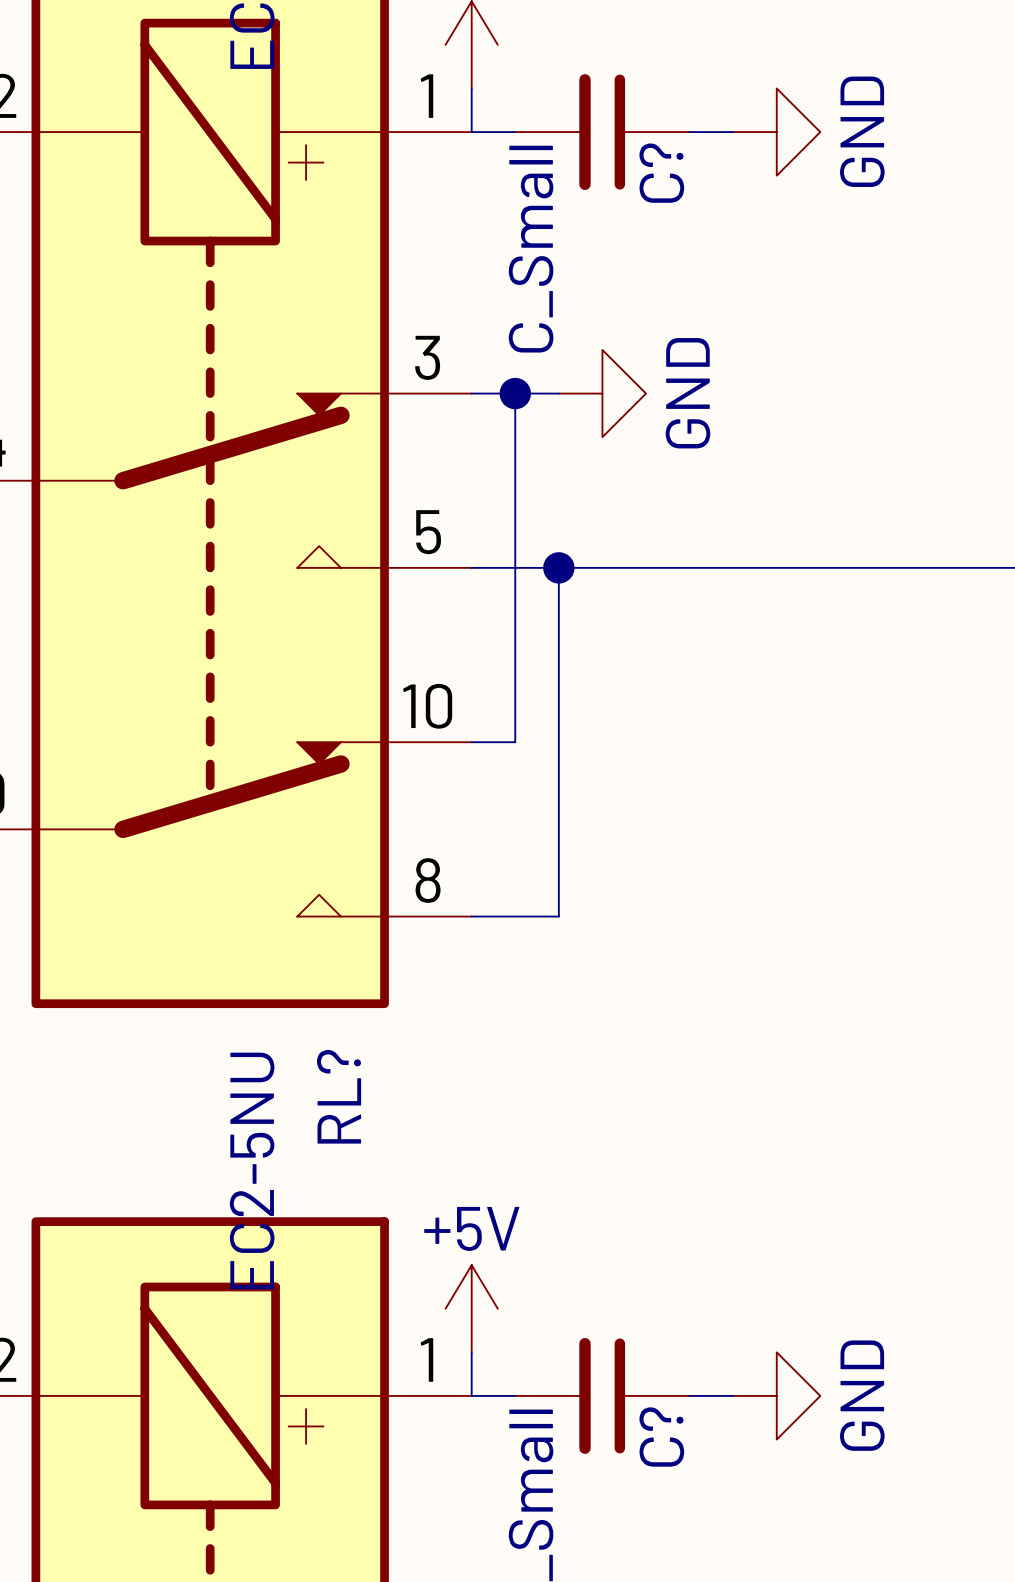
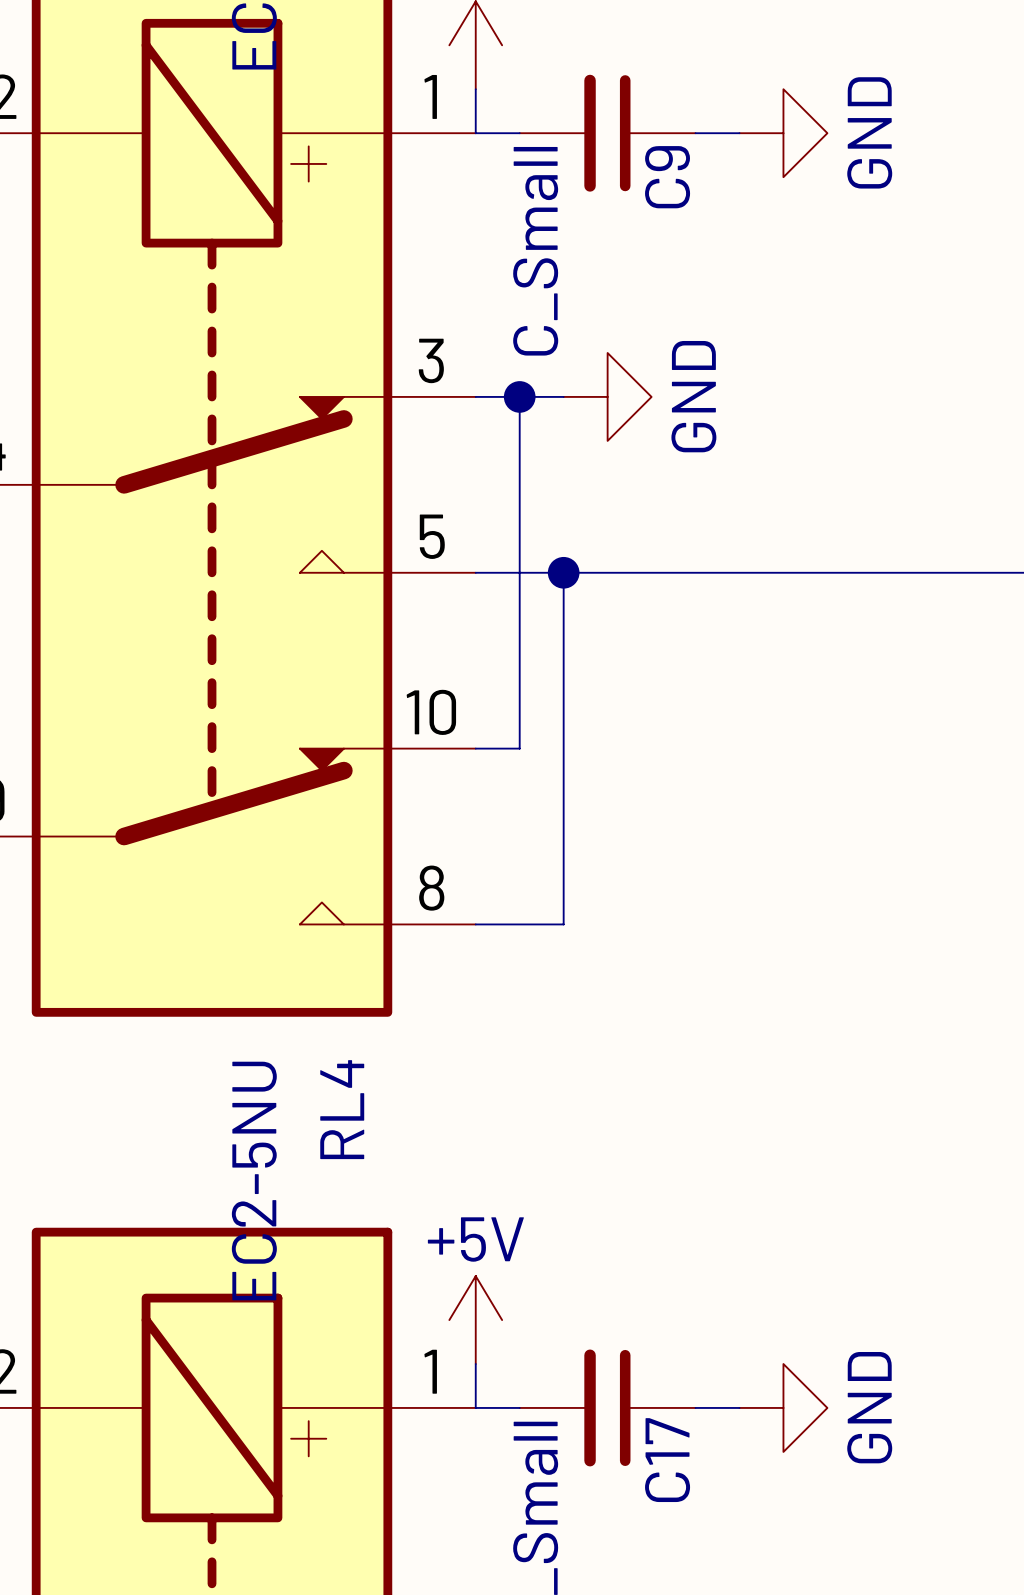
C? name: C? (661, 173) -> C9 (667, 177)
RL? name: RL? (339, 1096) -> RL4 (342, 1109)
C? name: C? (661, 1437) -> C17 (667, 1460)

